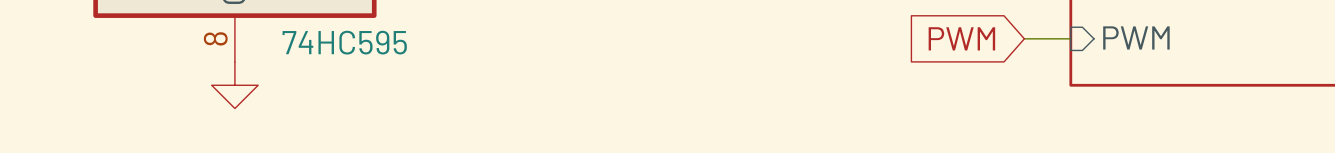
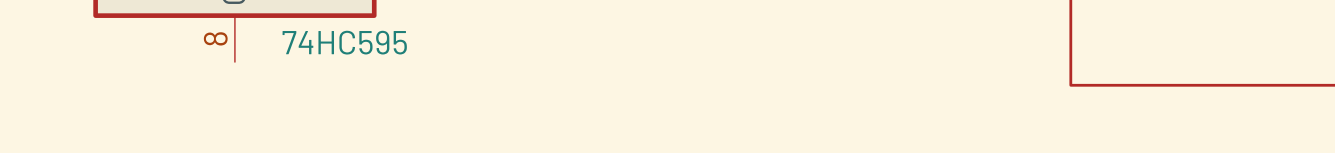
sheet pin: PWM (1136, 37) -> none
global label: PWM (961, 38) -> none
wire: (1024, 38) (1070, 38) -> none
power symbol: (234, 85) -> none

